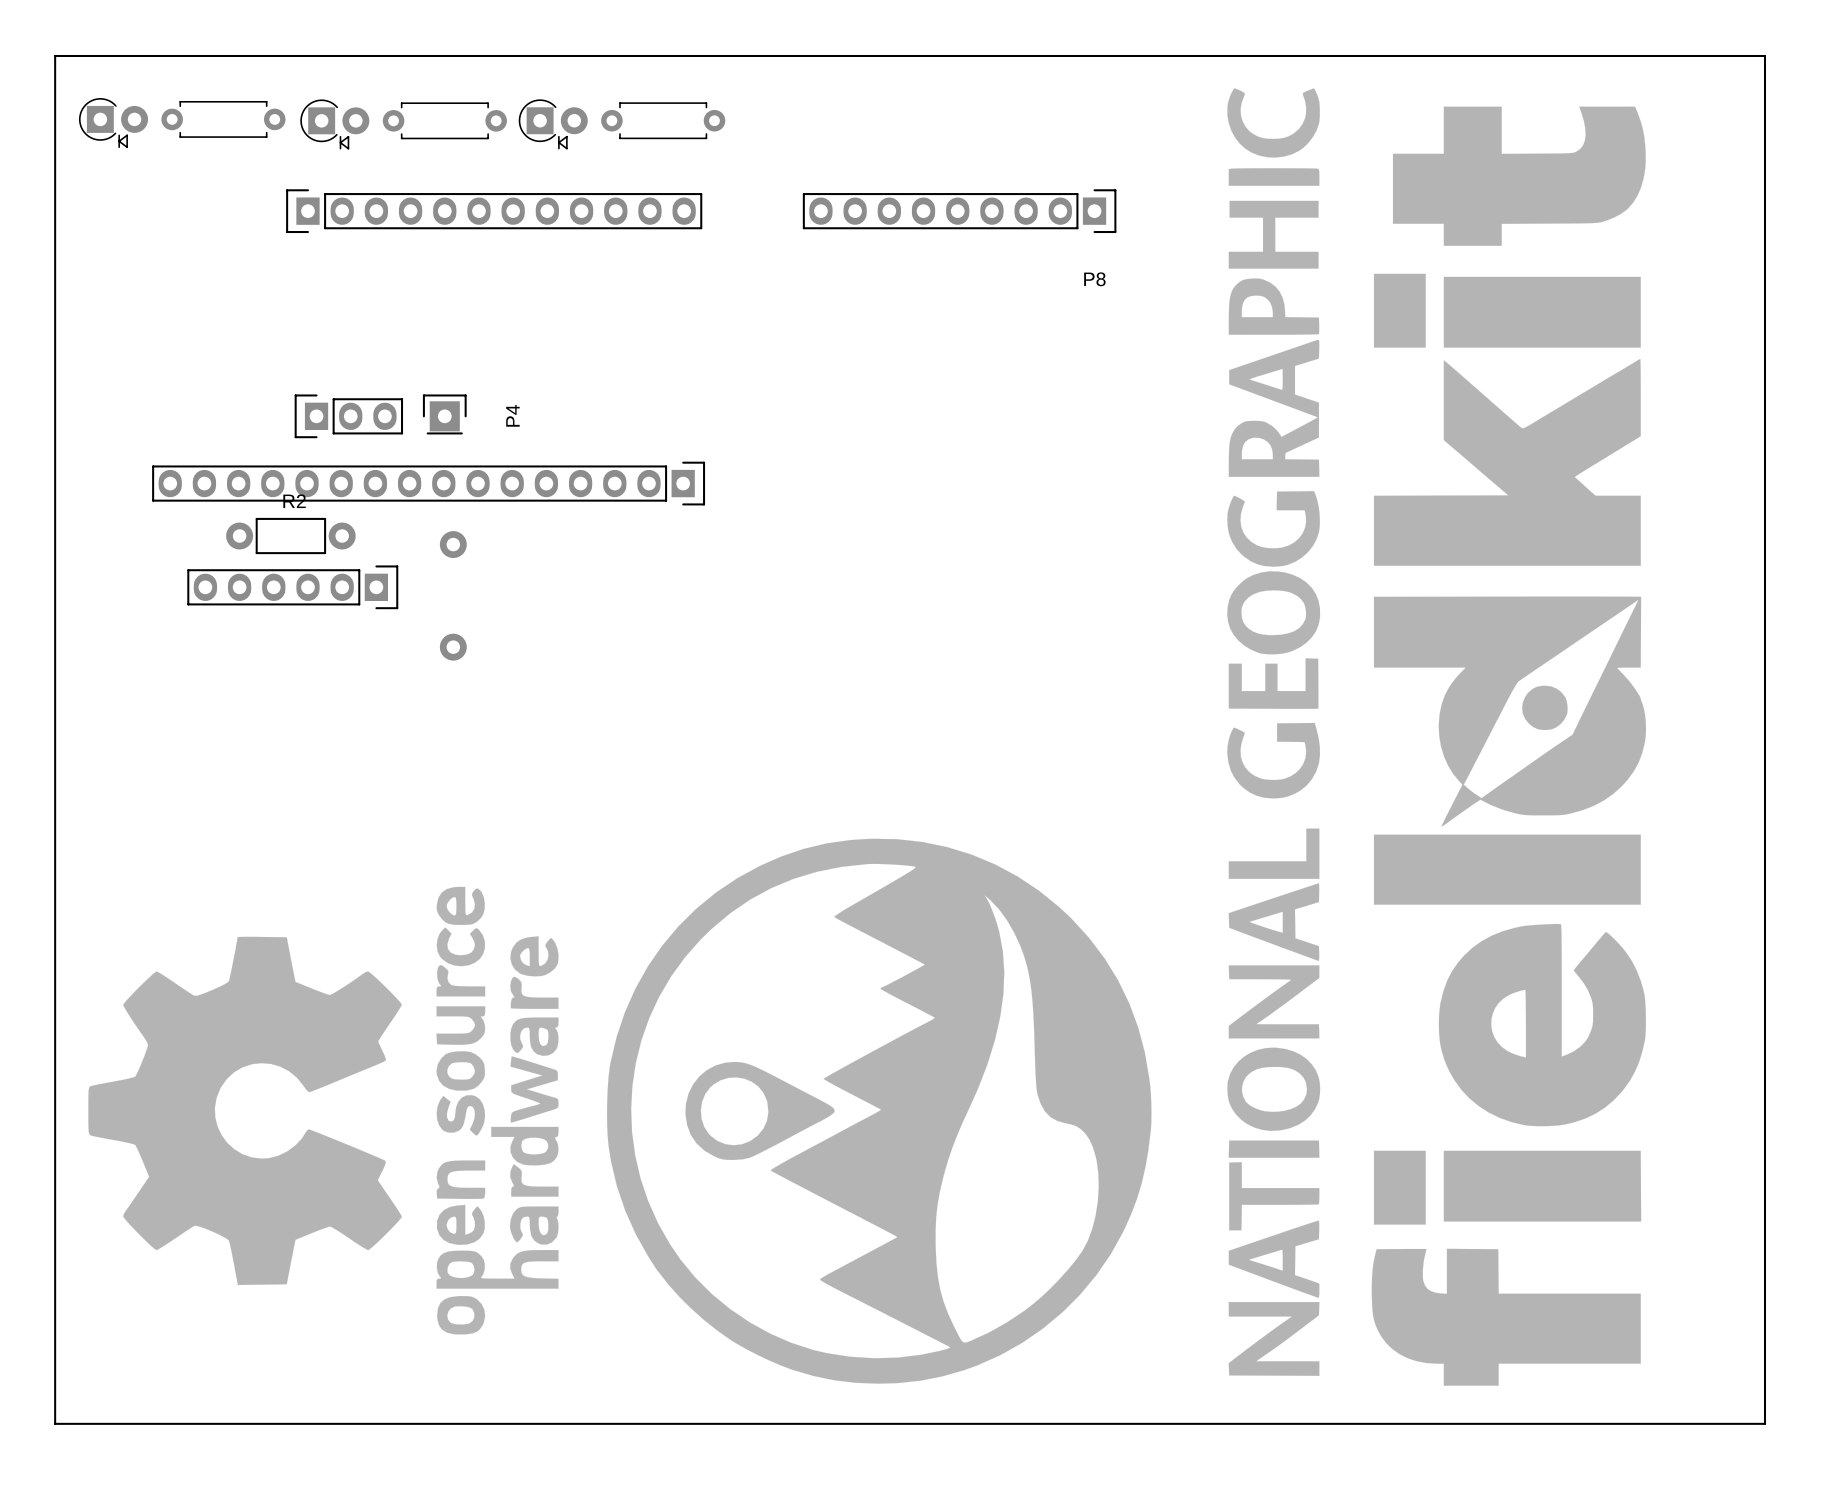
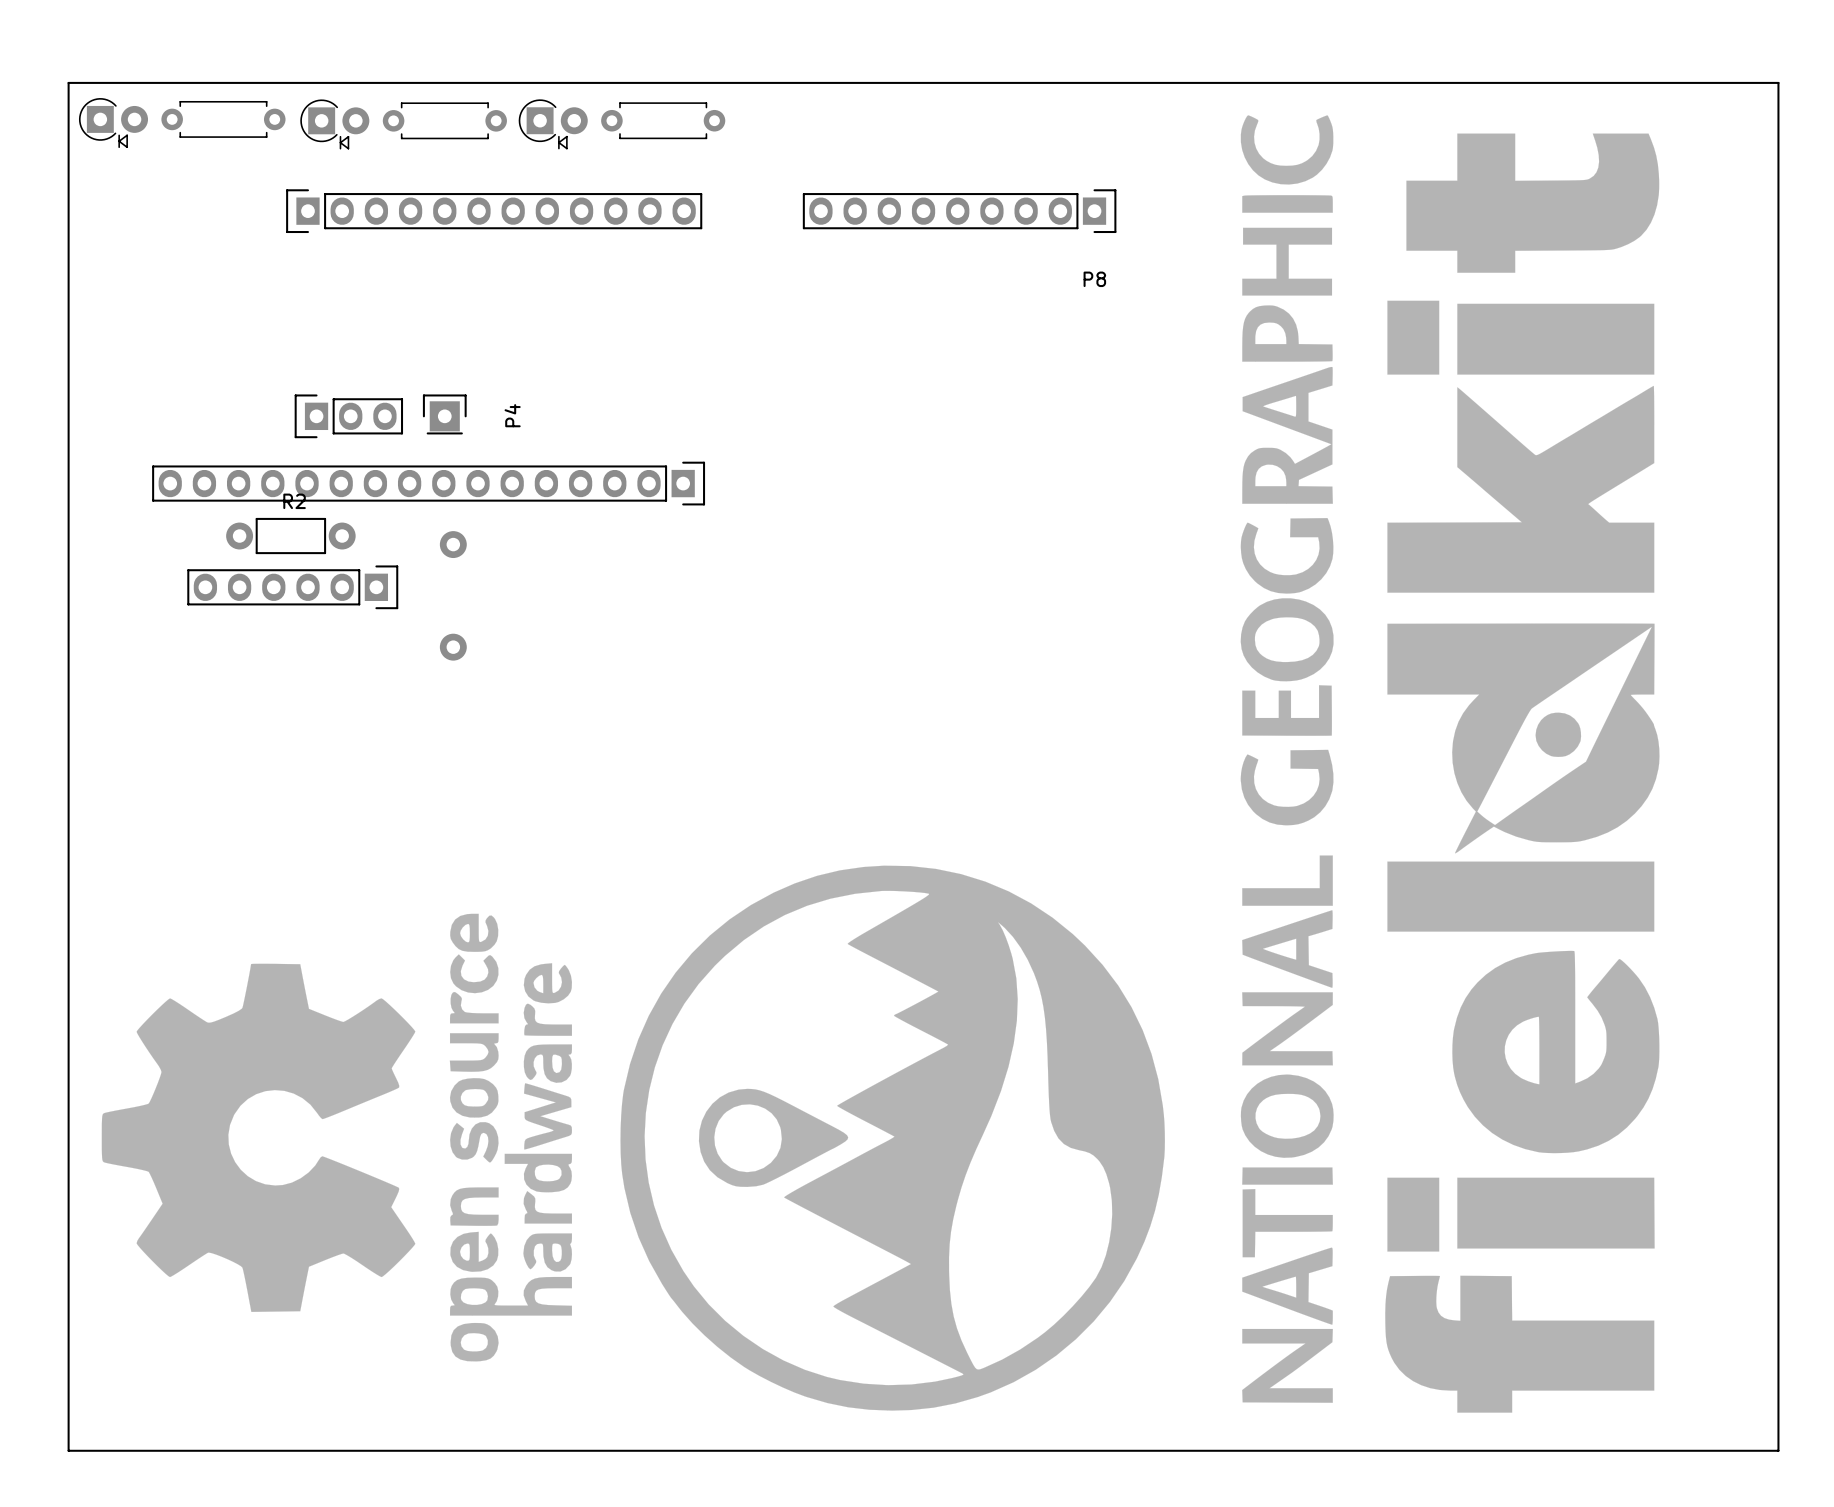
board edge: (55, 55) (55, 1423) (1764, 1423) (1764, 55) (55, 55) -> (68, 82) (68, 1450) (1778, 1450) (1778, 82) (68, 82)
drawing position: (1436, 737) -> (1450, 764)
drawing position: (619, 1111) -> (633, 1138)

